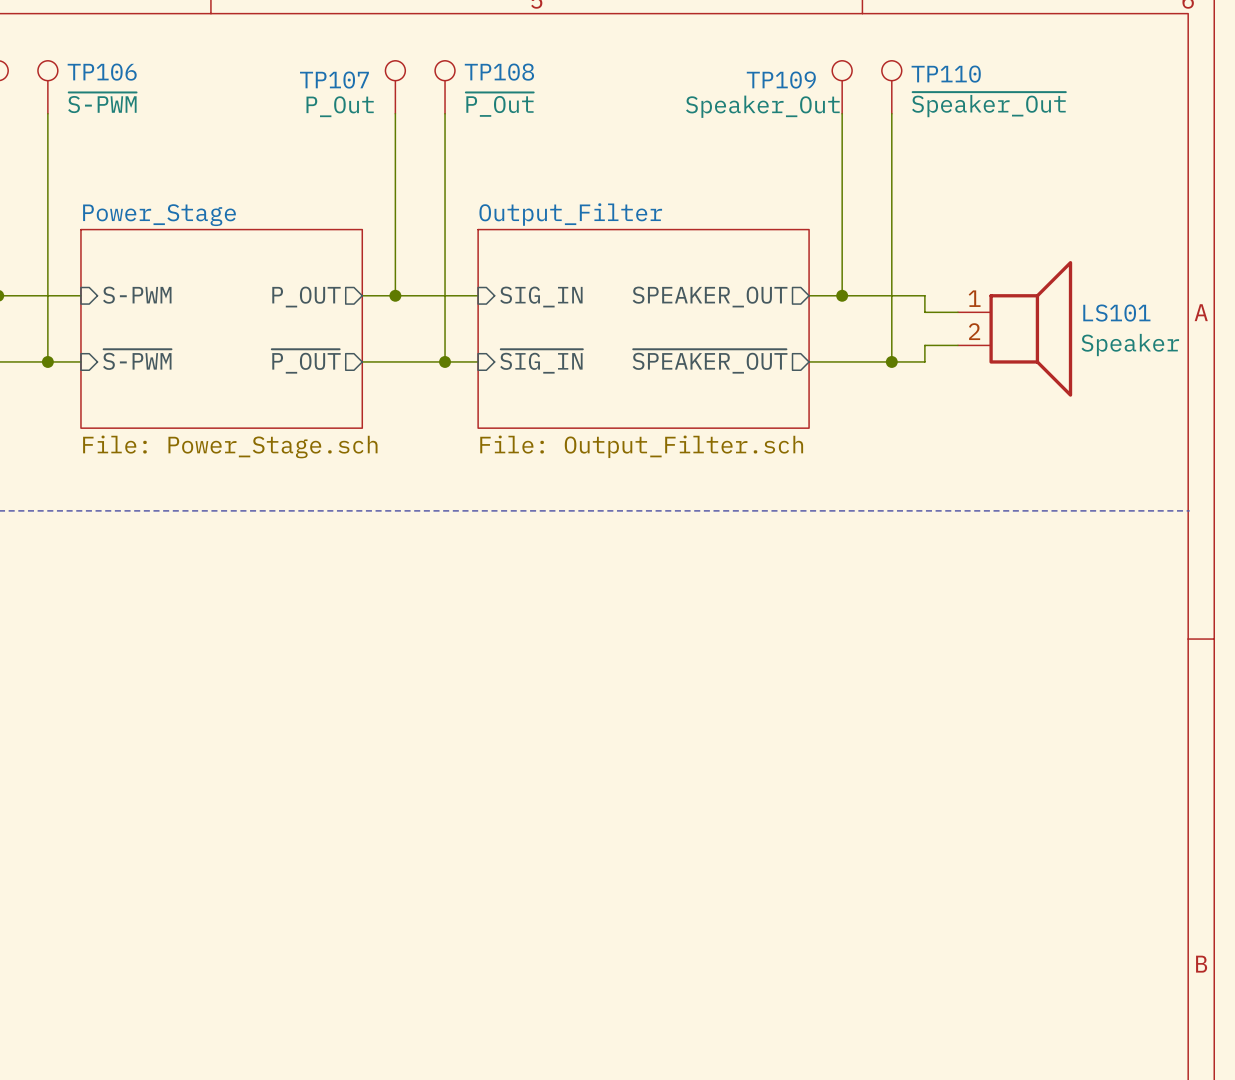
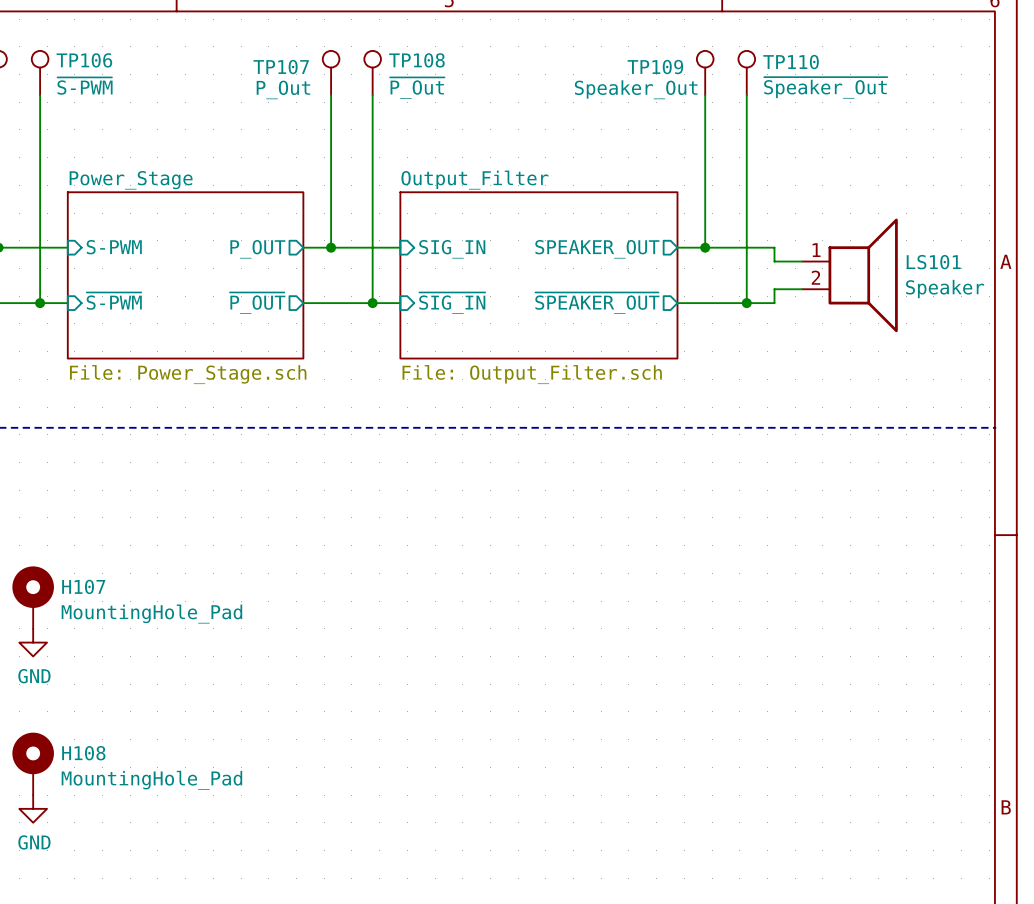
H107: none -> MountingHole_Pad (33, 597)
power symbol: none -> GND (33, 642)
H108: none -> MountingHole_Pad (33, 763)
power symbol: none -> GND (33, 808)

